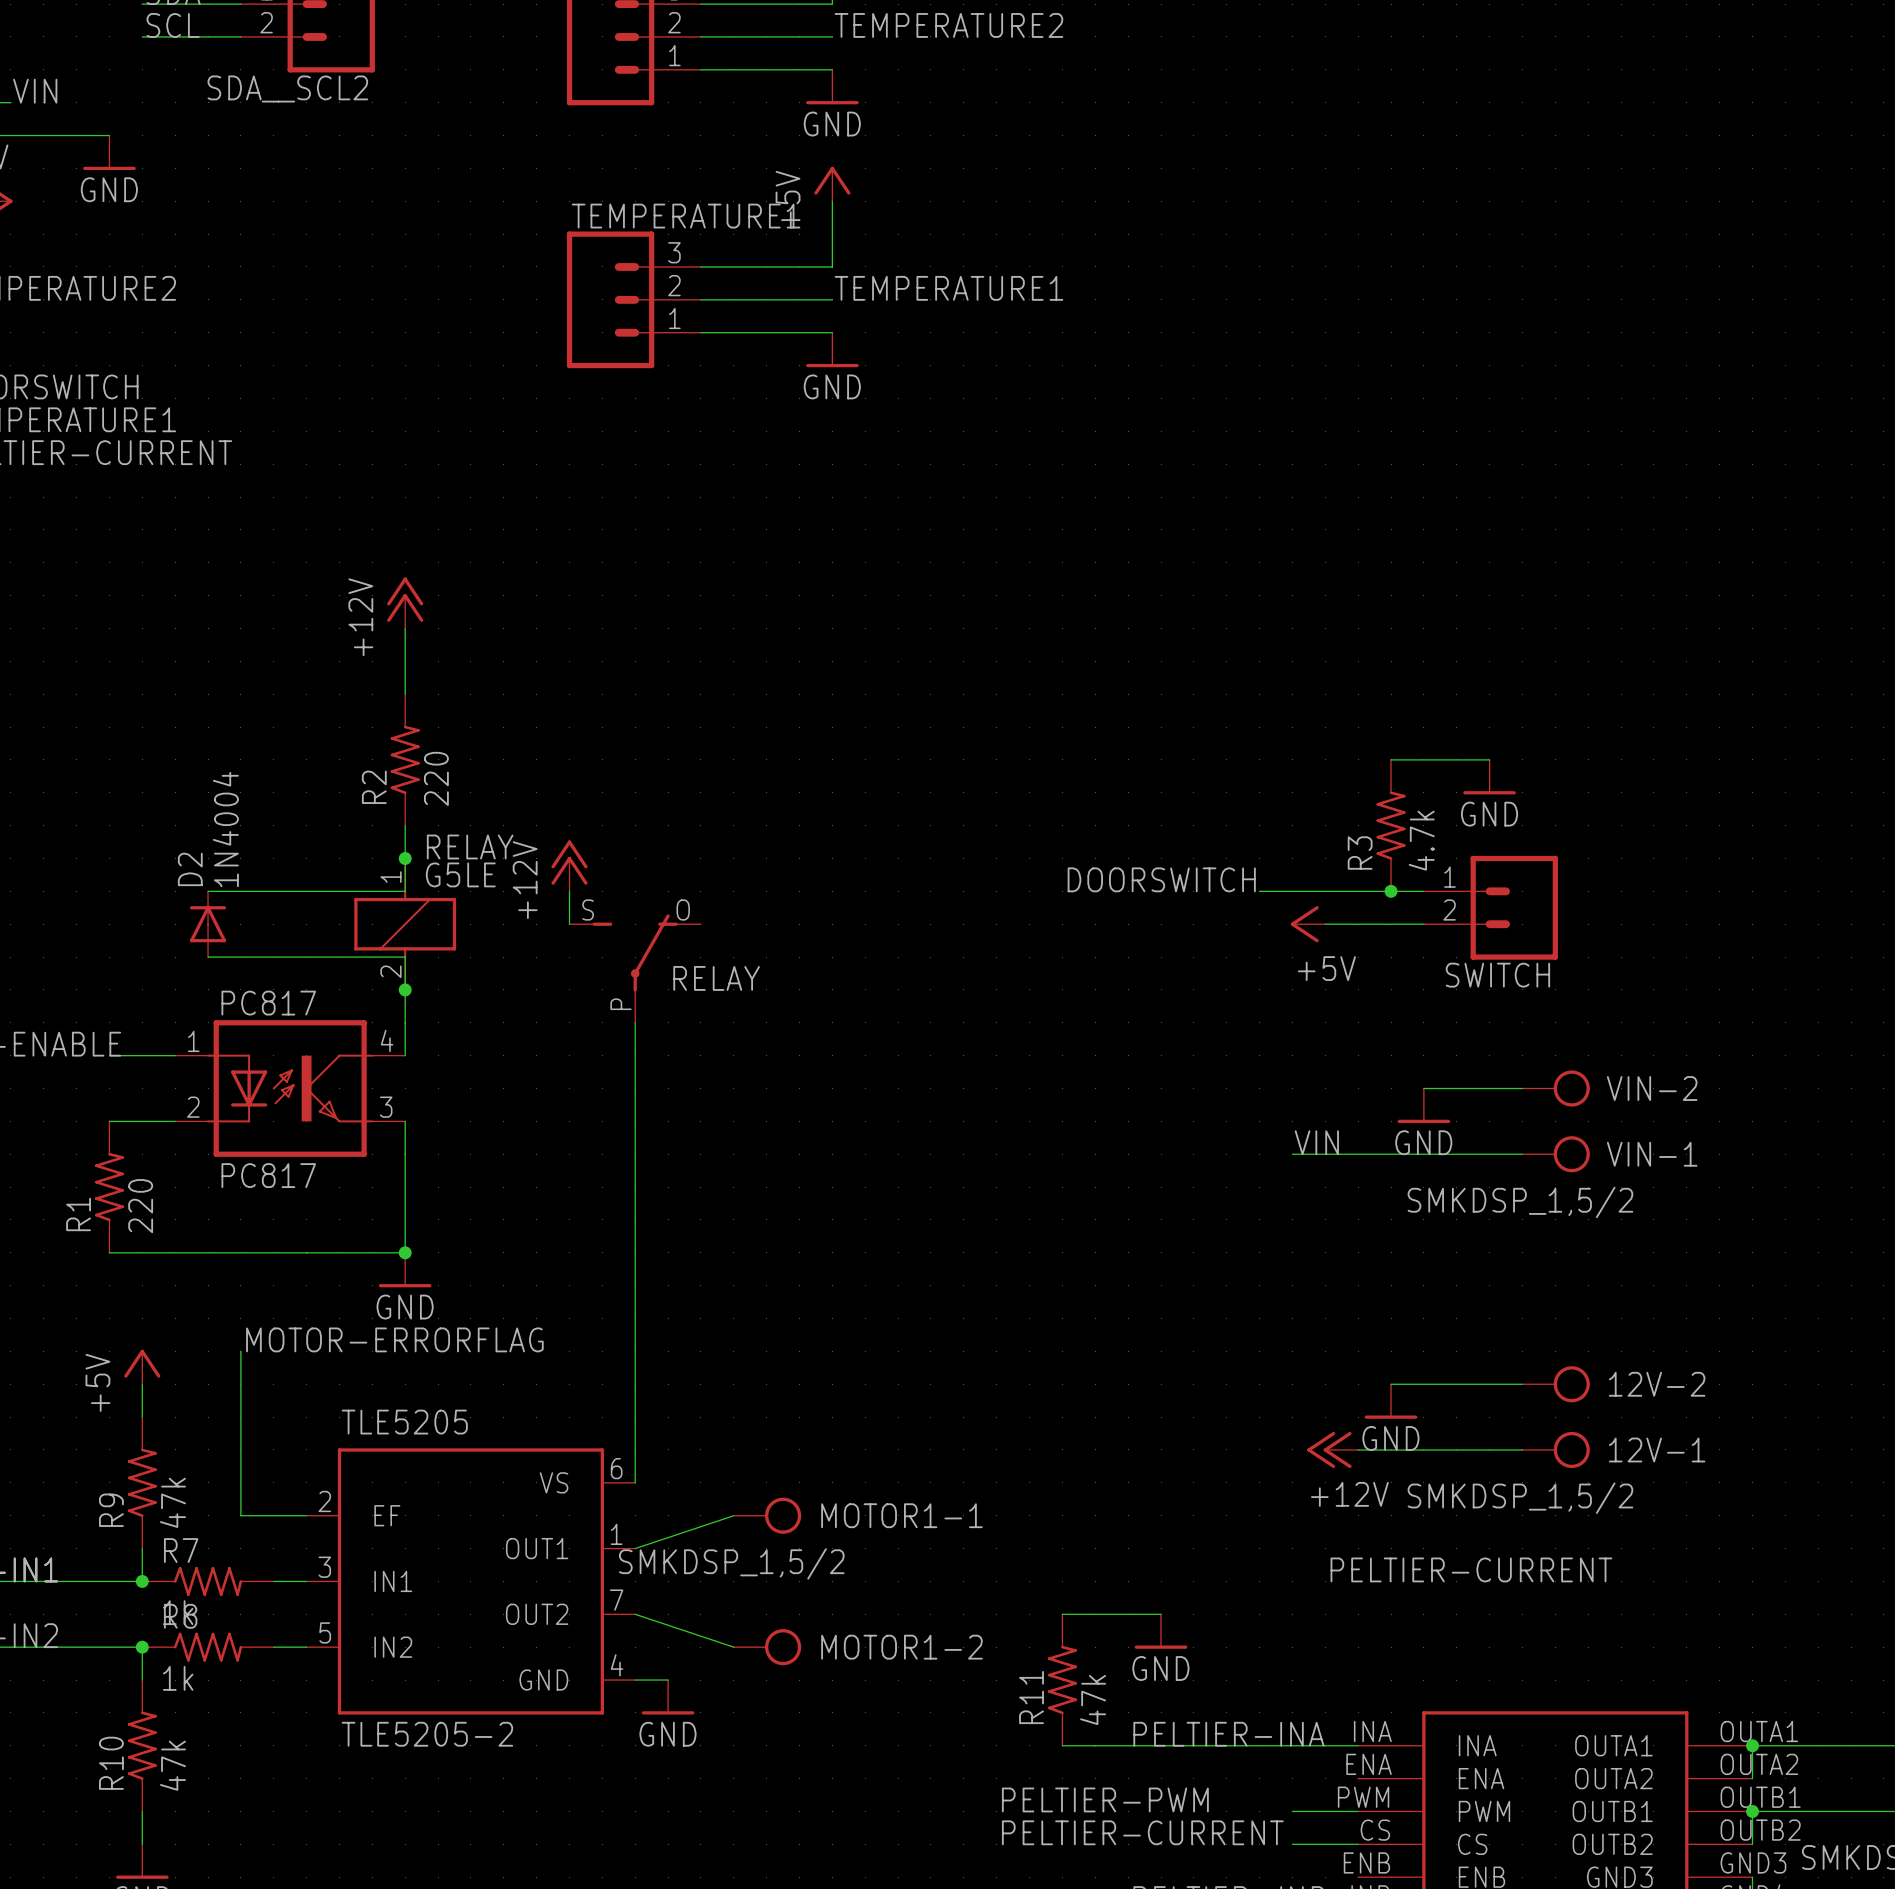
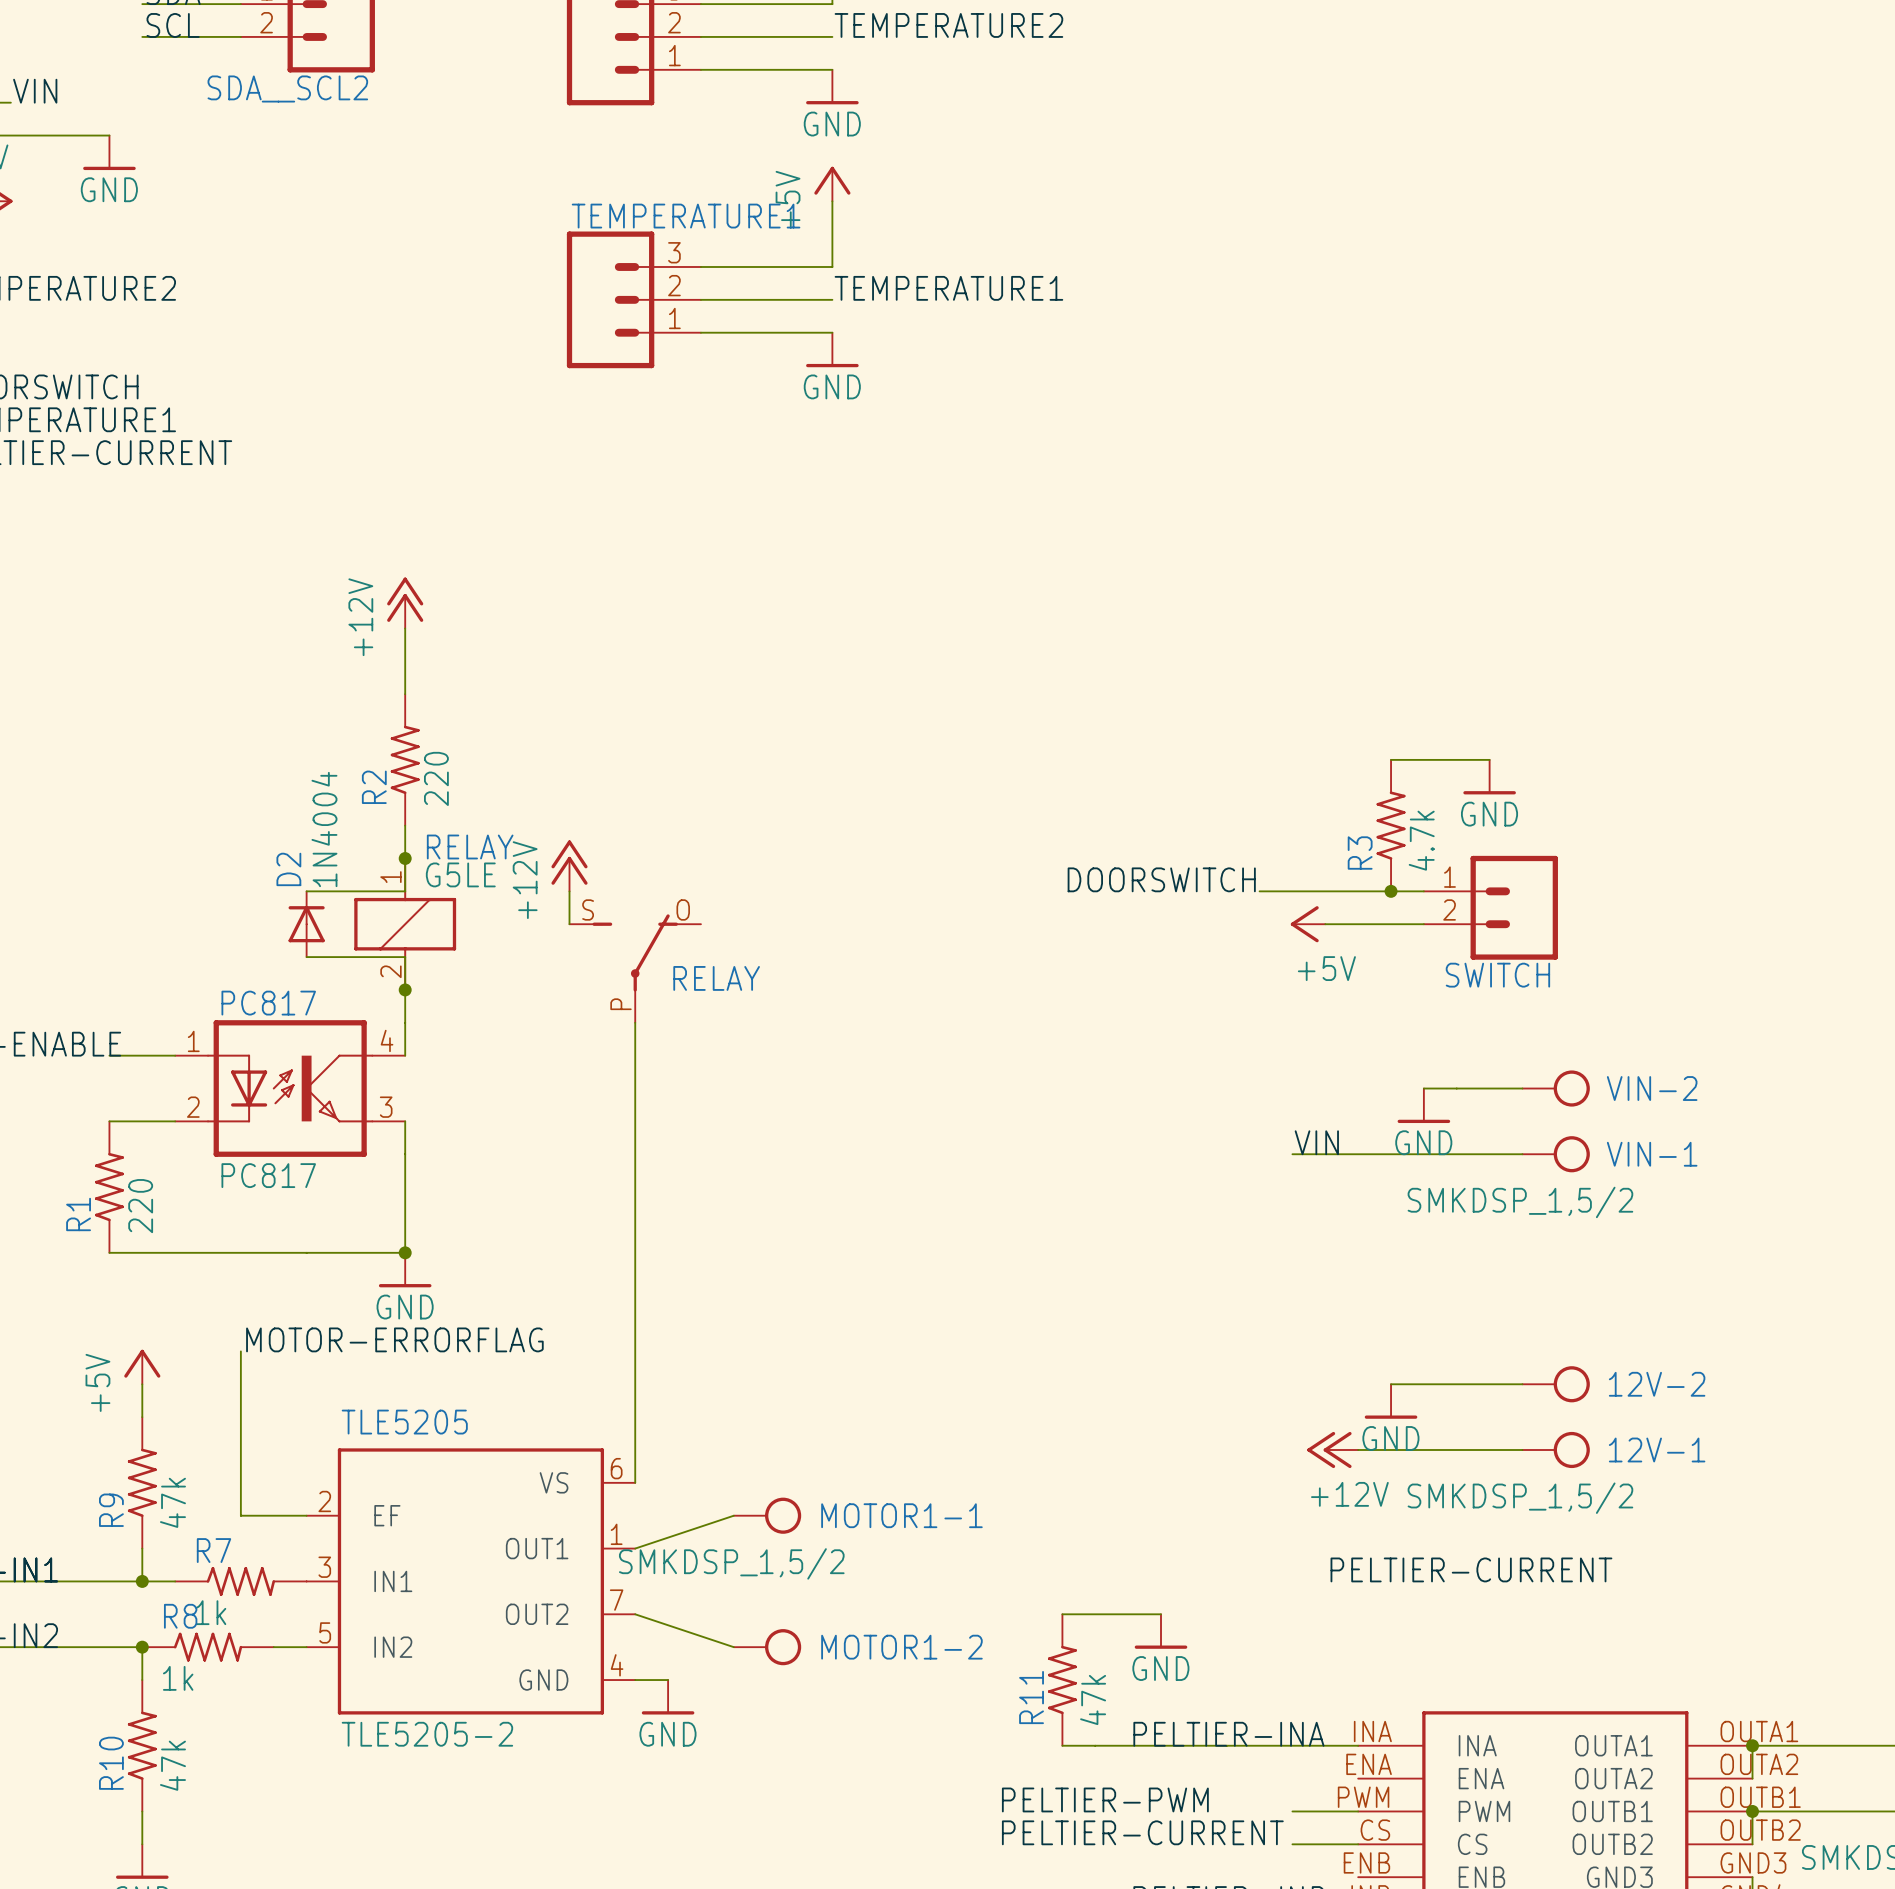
wire: (208, 891) (306, 891) -> none
D2 position: (208, 924) -> (306, 924)
wire: (208, 957) (306, 957) -> none
R7 position: (208, 1581) -> (240, 1581)

